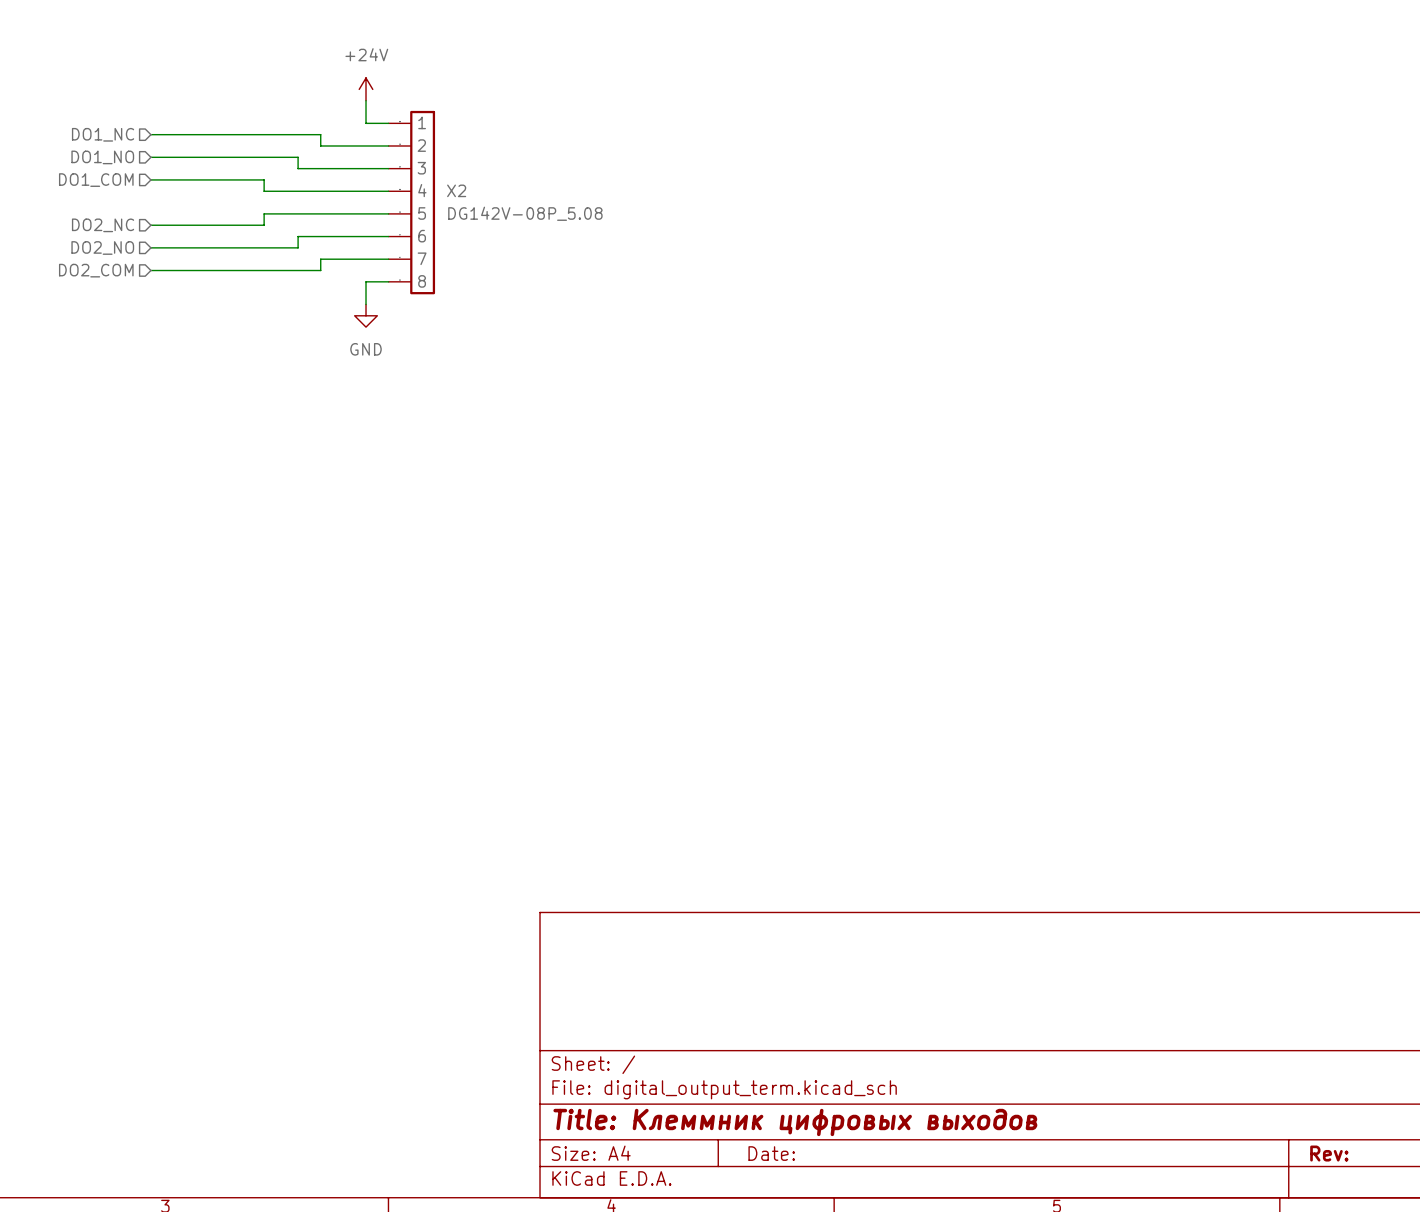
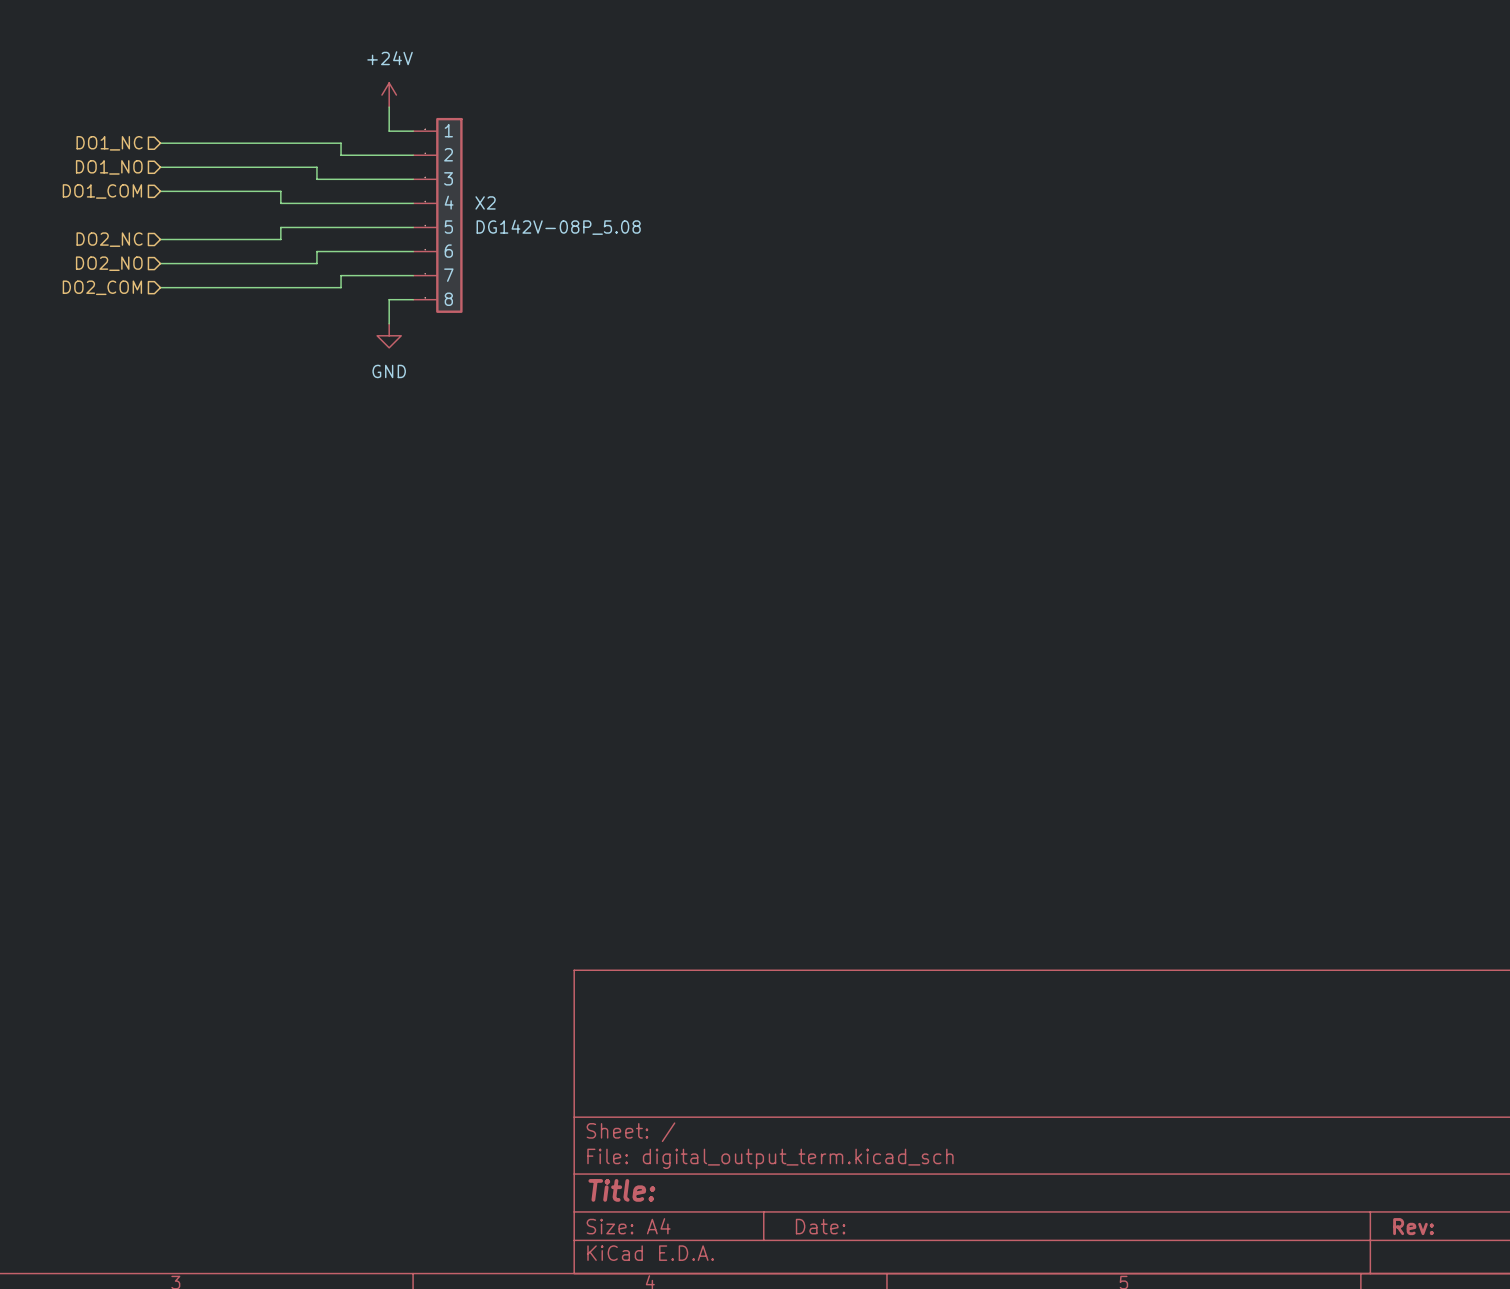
title block: Title: Клеммник цифровых выходов (795, 1122) -> Title: (621, 1190)

